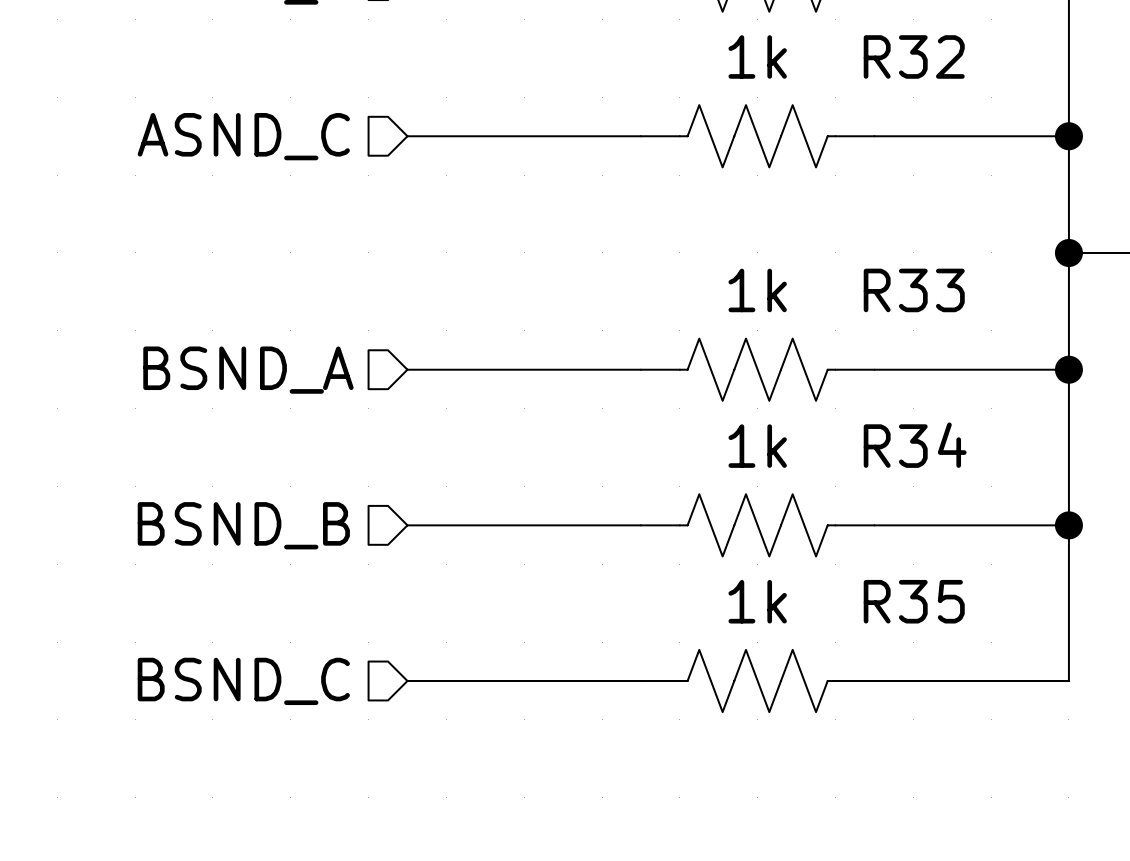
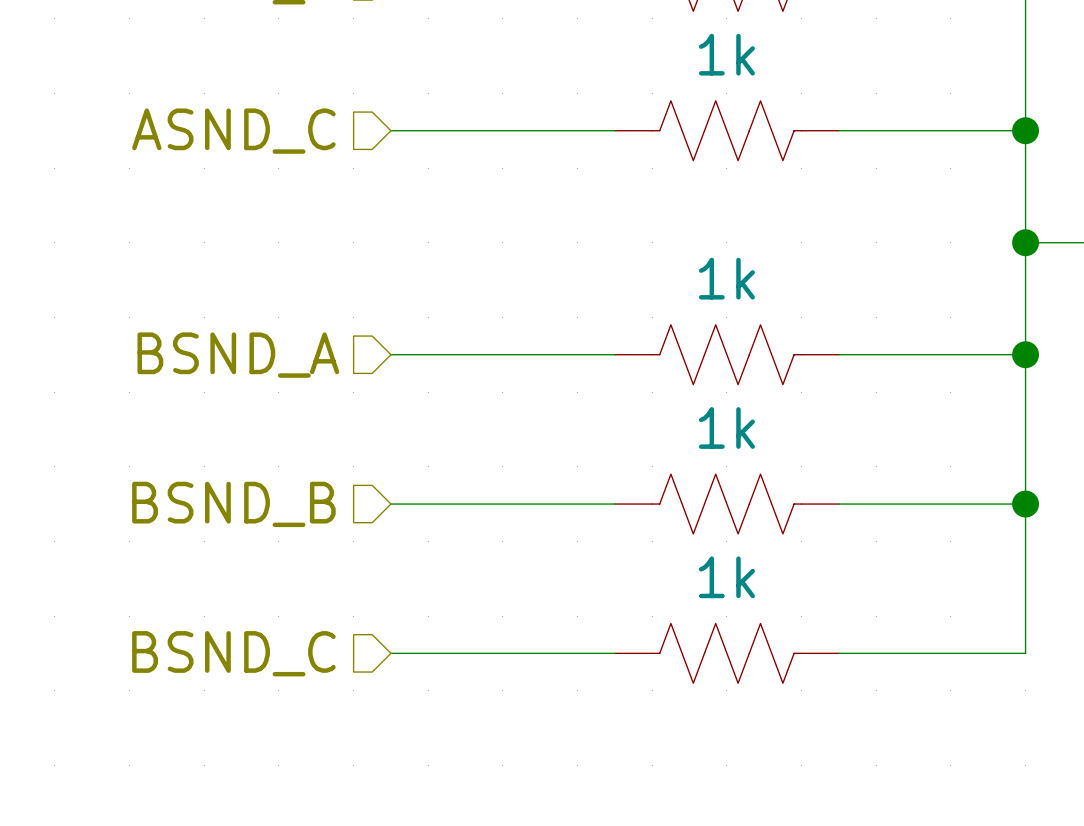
R32 name: R32 (914, 56) -> none
R33 name: R33 (914, 290) -> none
R34 name: R34 (915, 445) -> none
R35 name: R35 (914, 601) -> none

